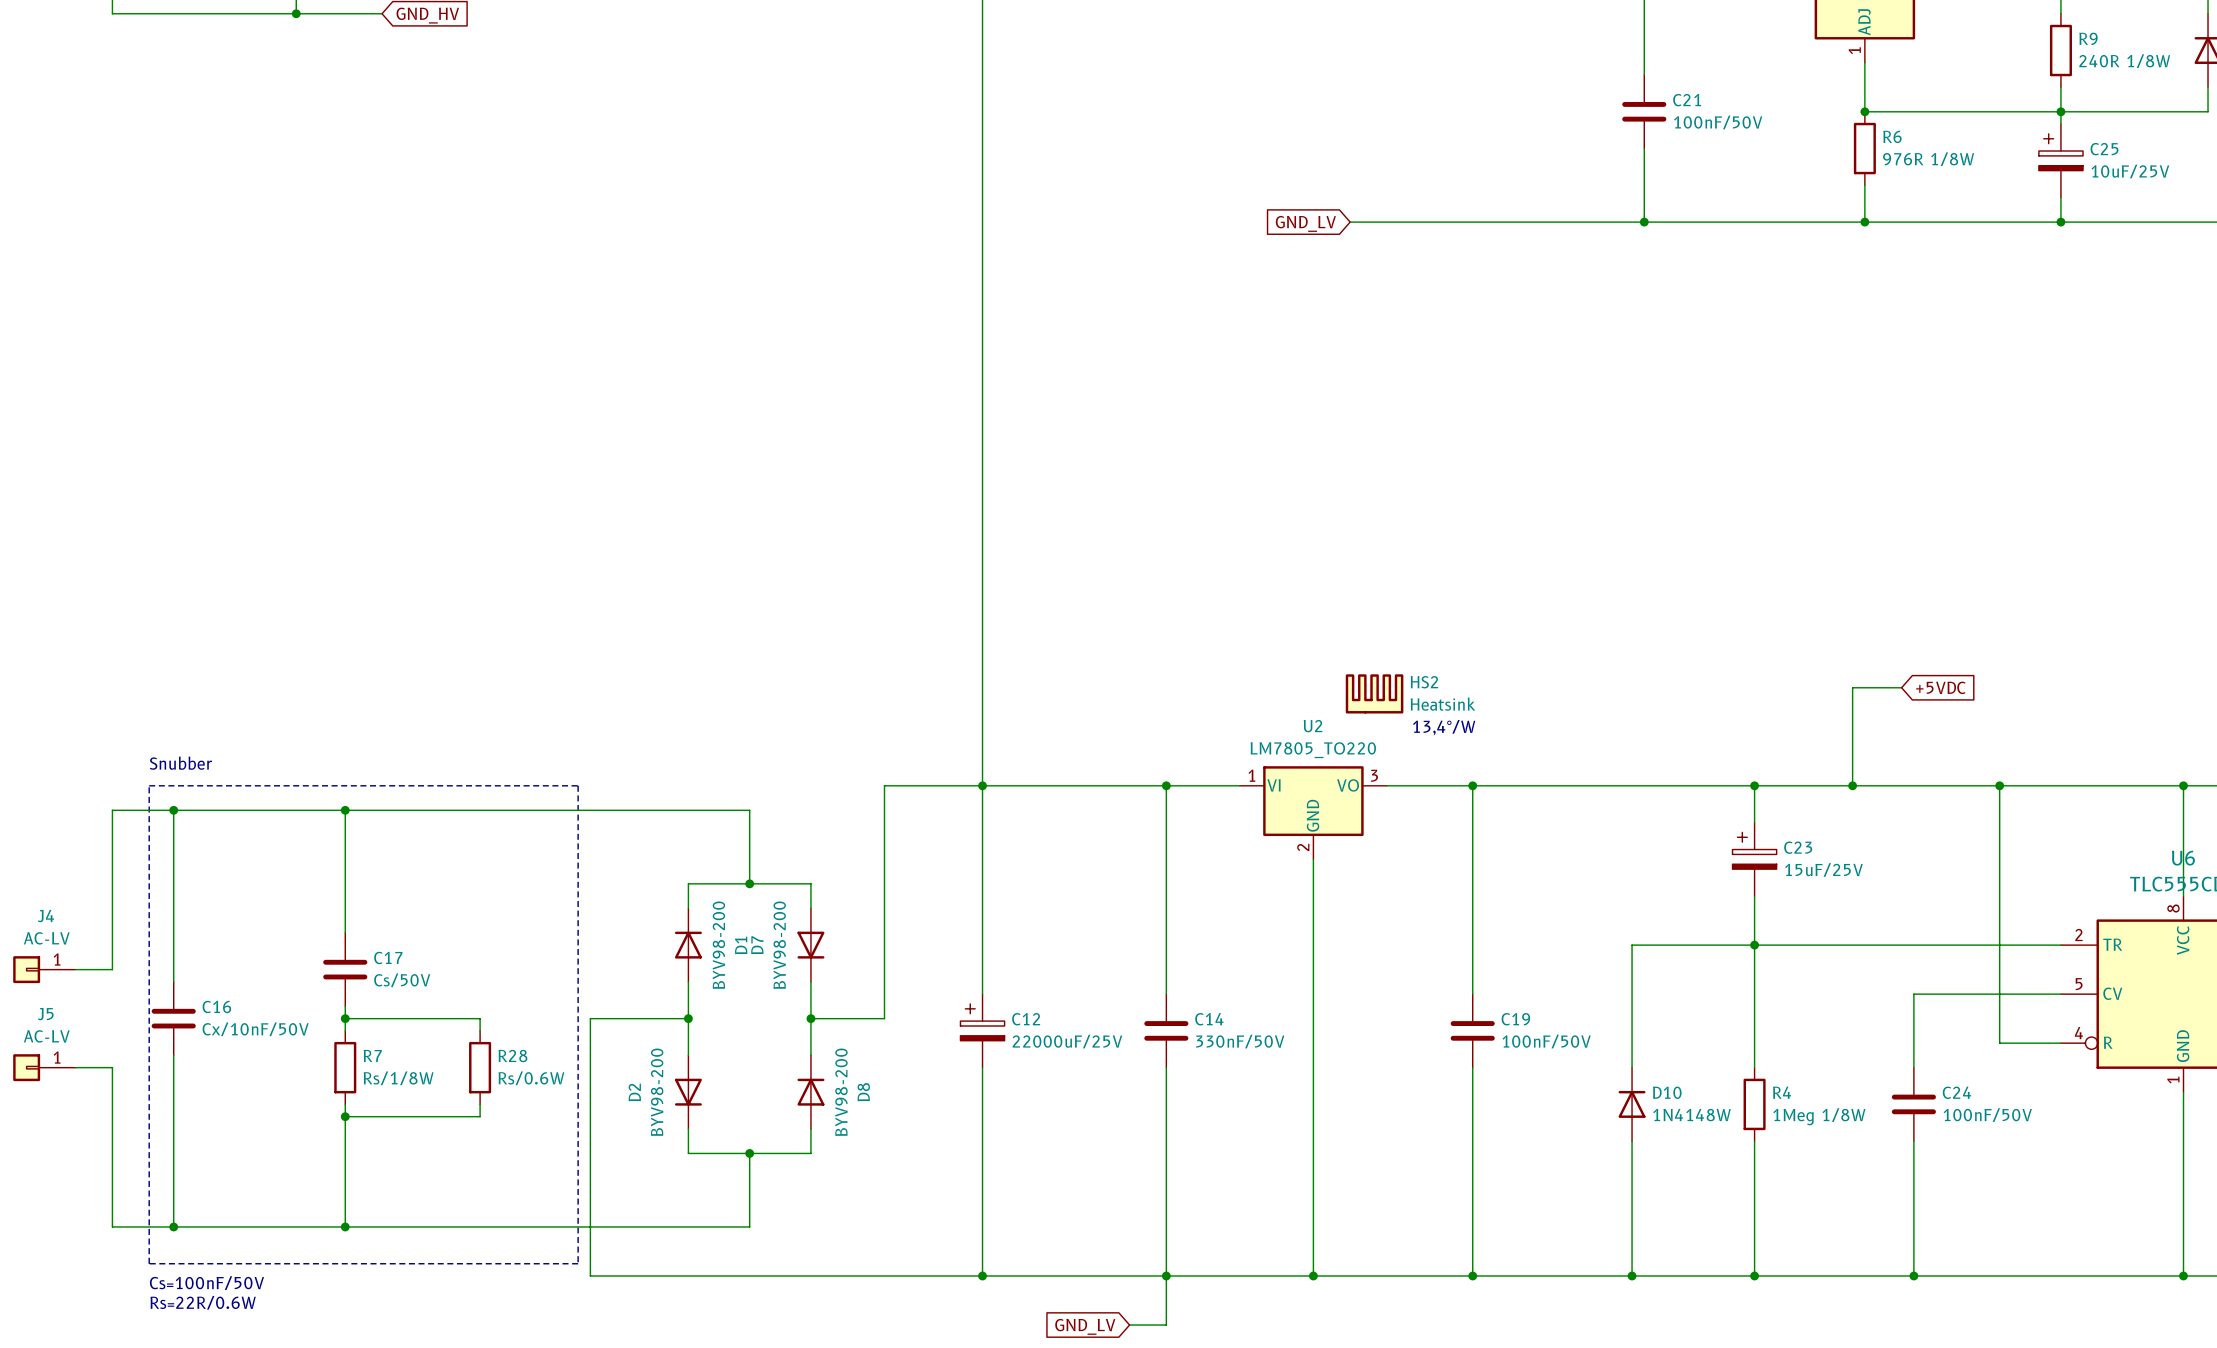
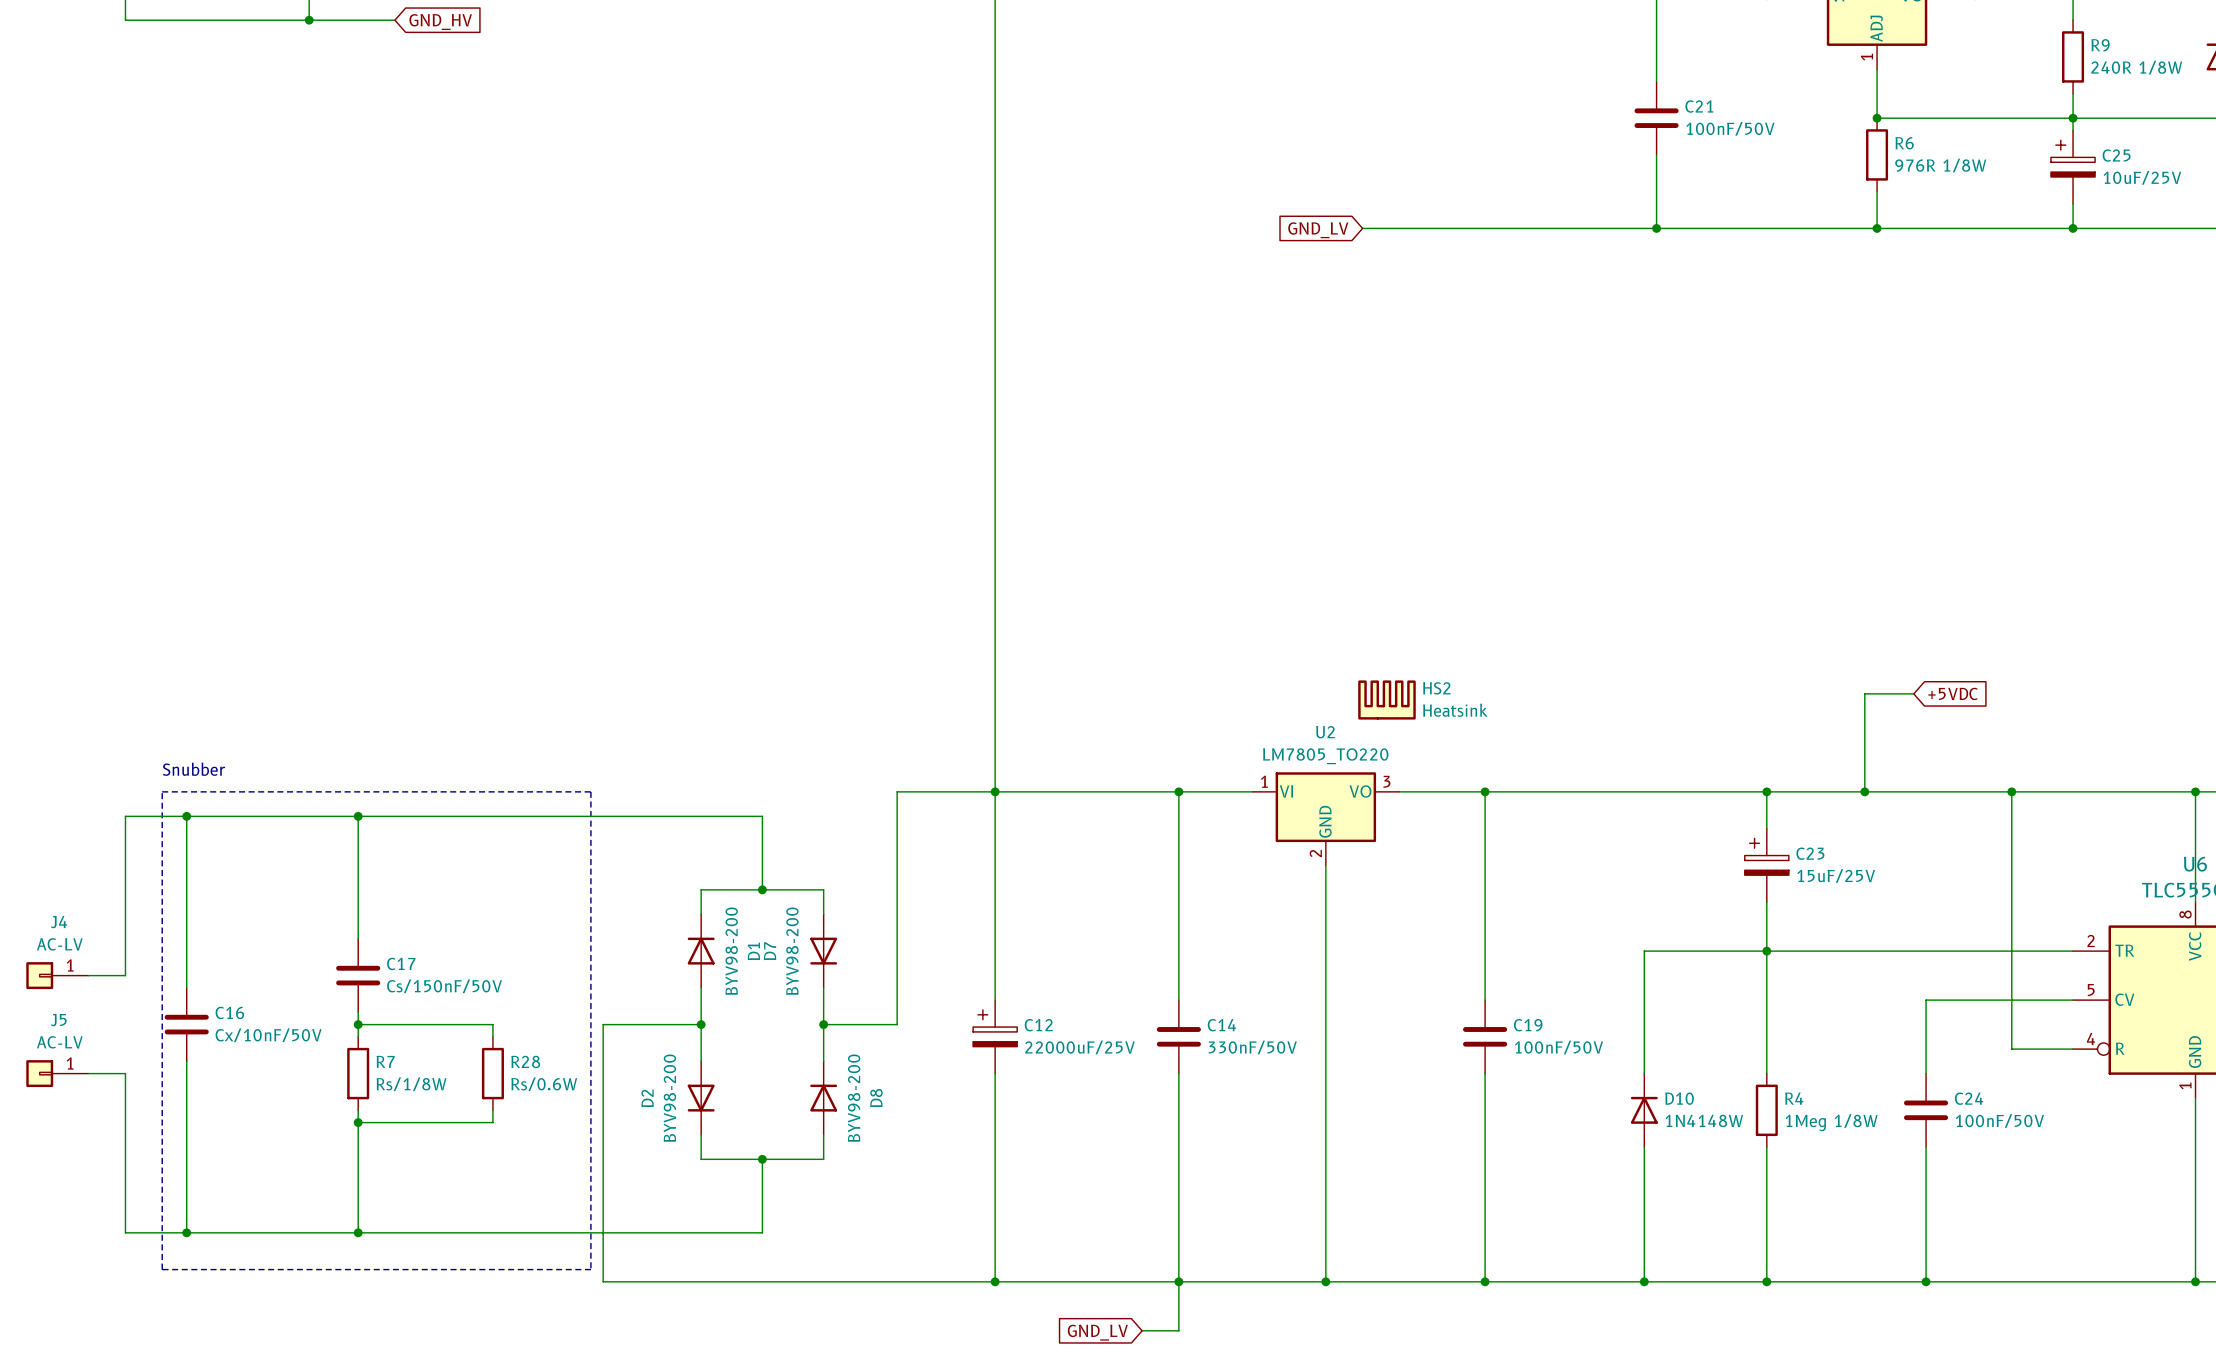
text: 13,4°/W (1444, 727) -> none
C17 value: Cs/50V (402, 980) -> Cs/150nF/50V (444, 986)
text: Cs=100nF/50V (206, 1283) -> none
text: Rs=22R/0.6W (203, 1302) -> none

